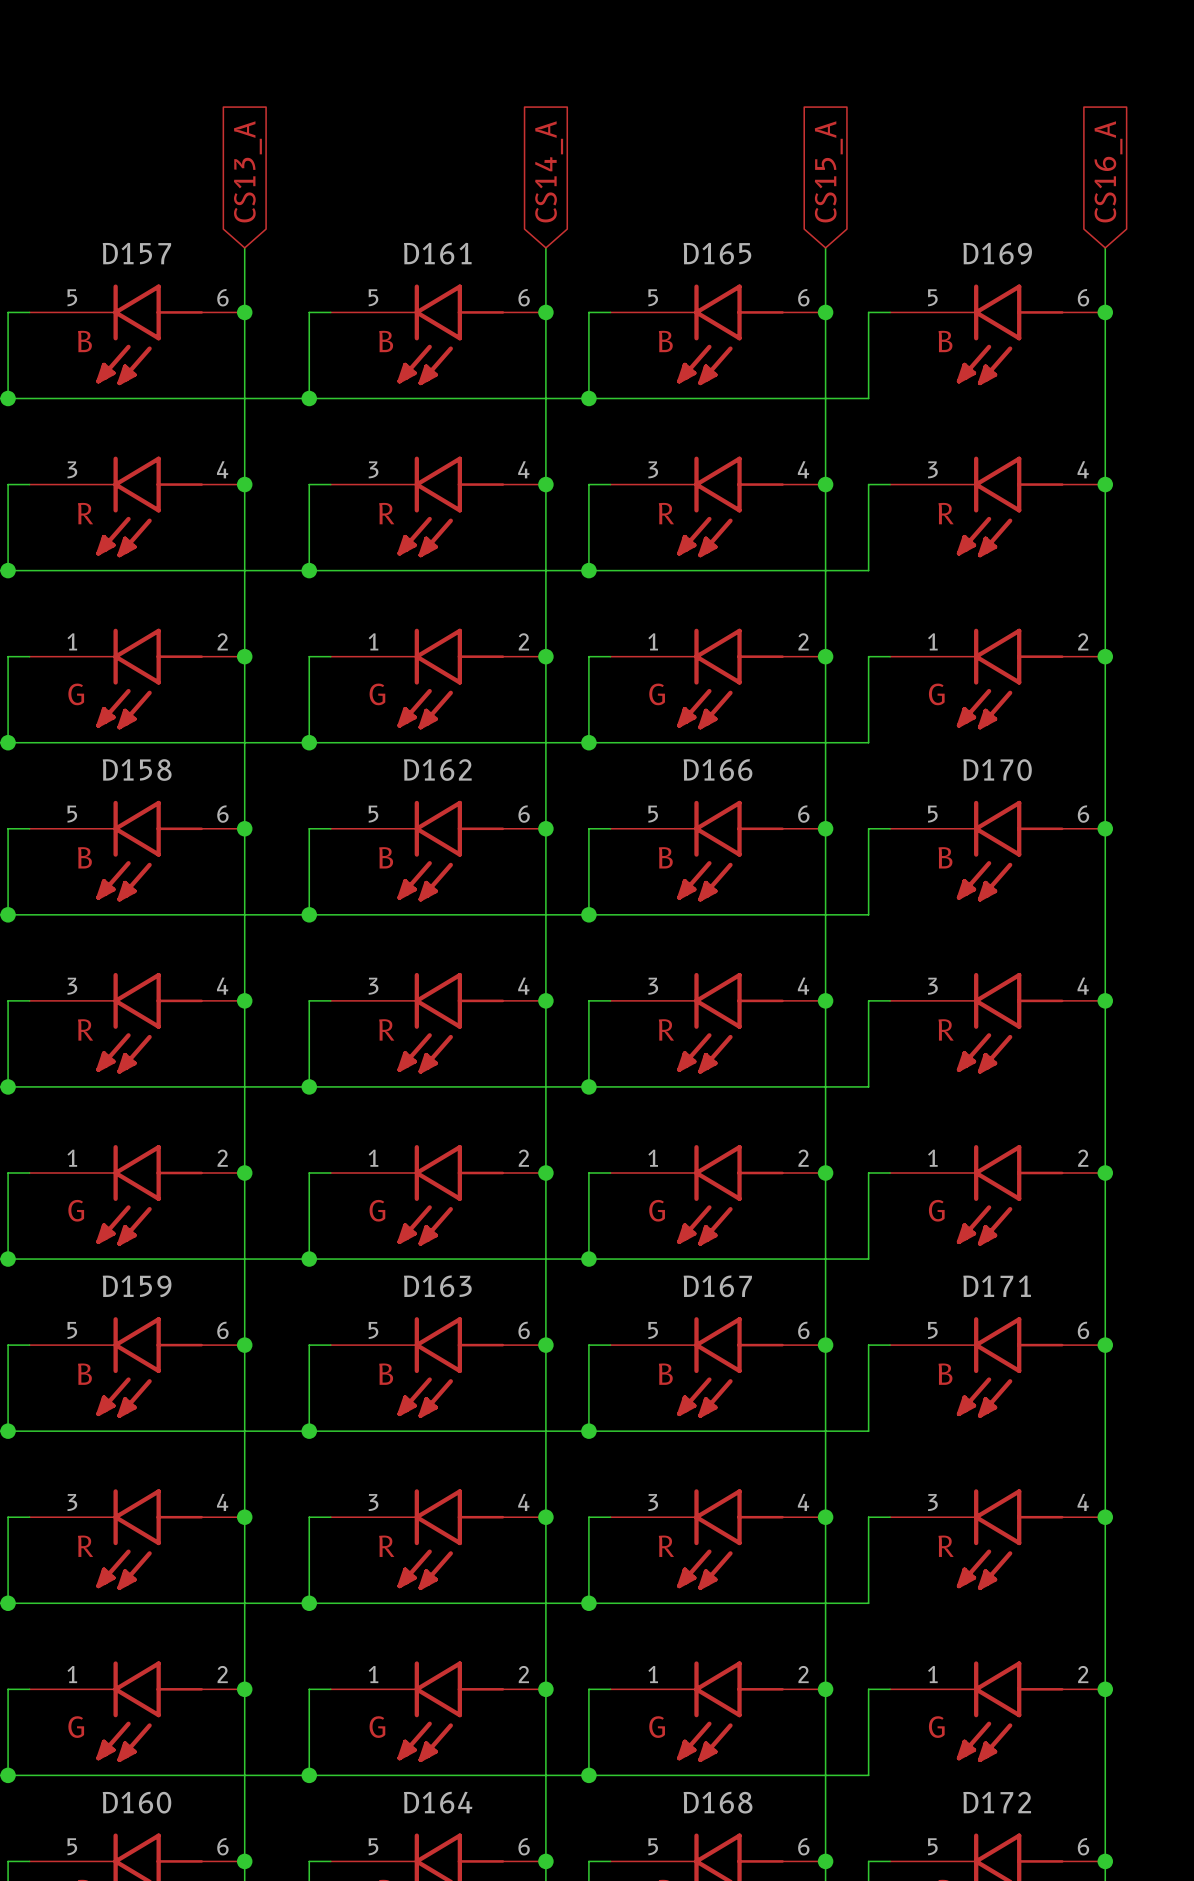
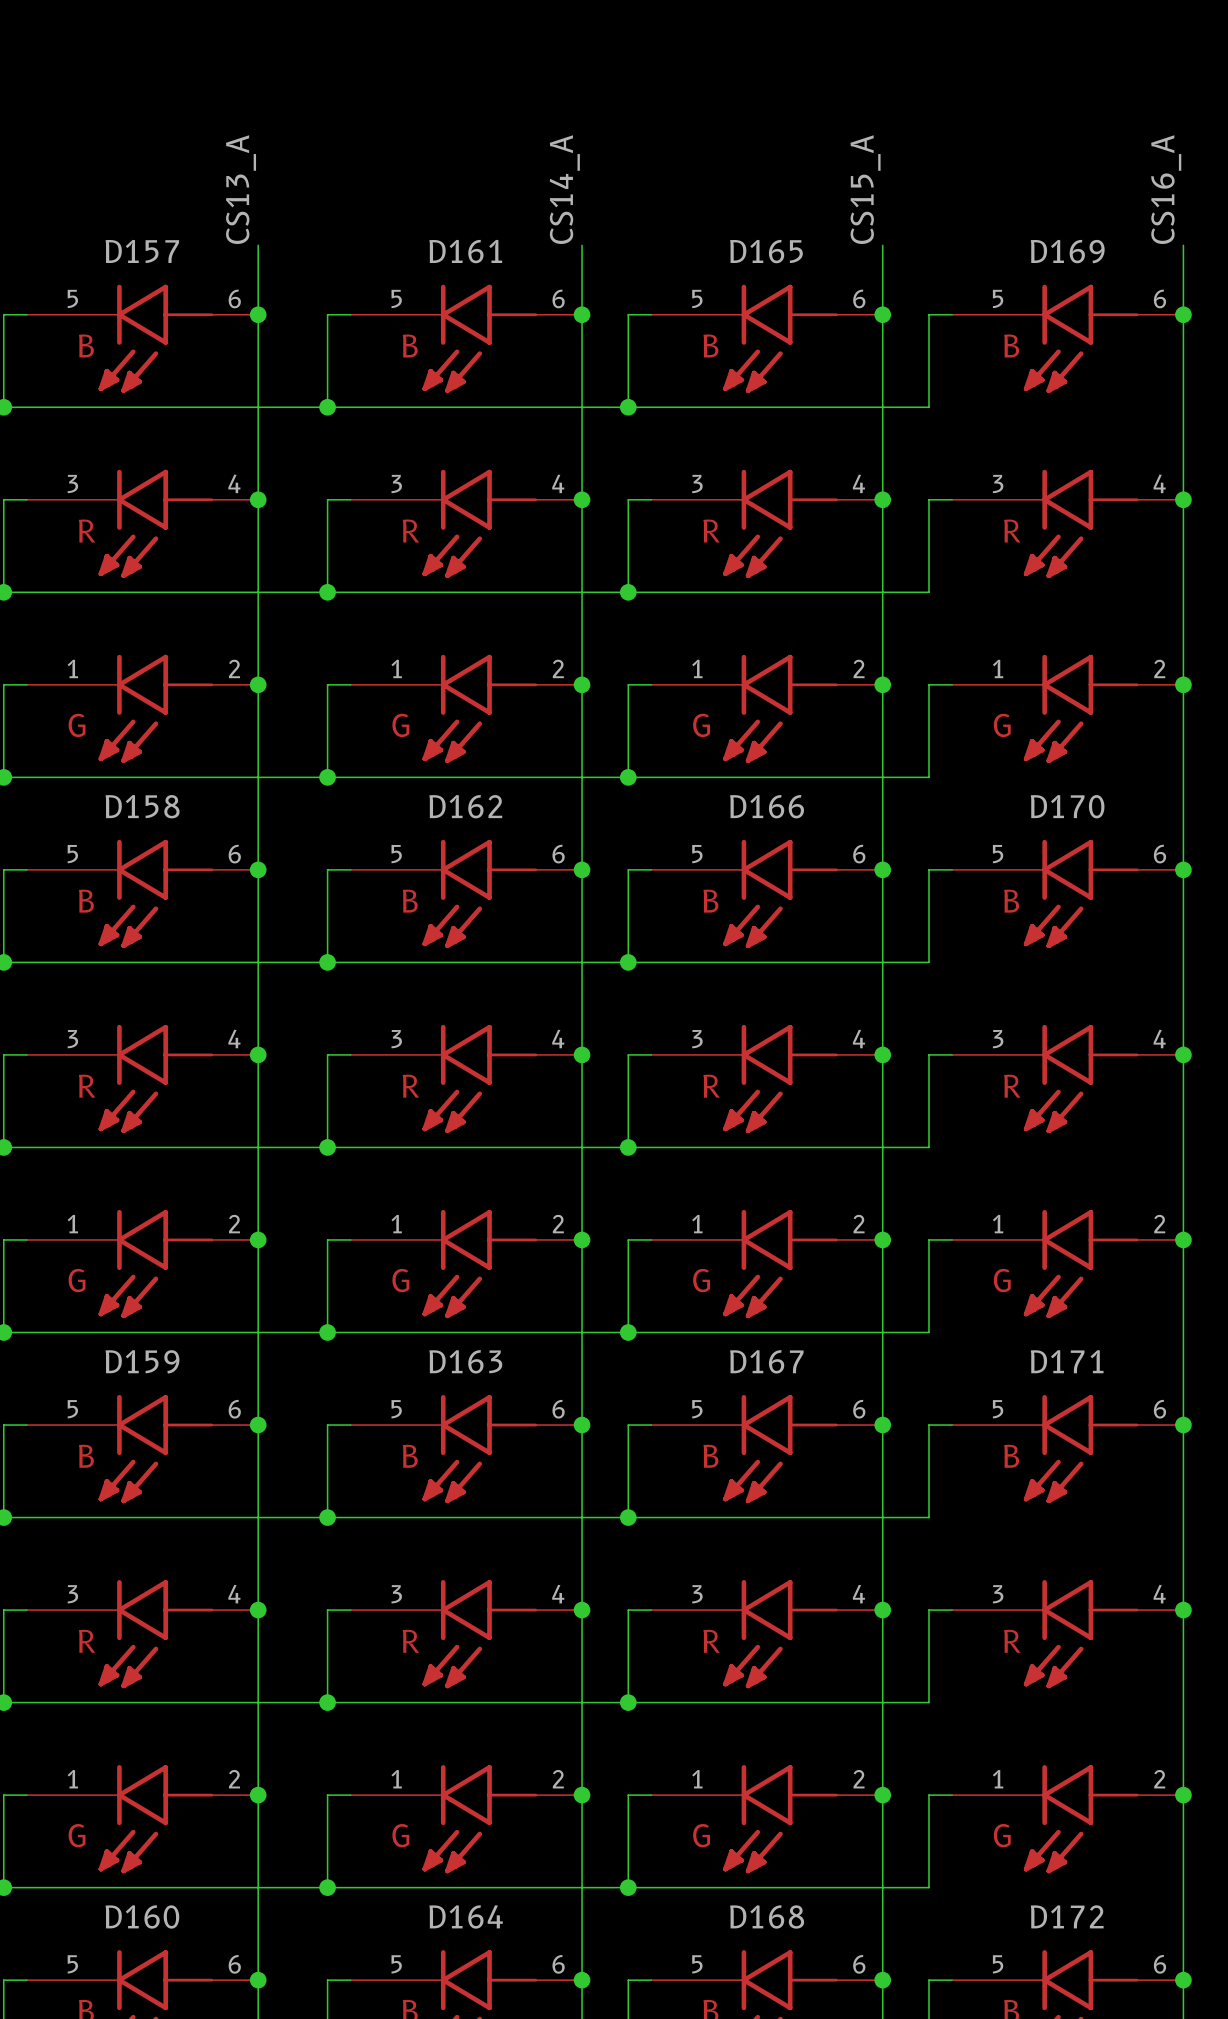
global label: CS13_A (247, 171) -> none
global label: CS14_A (549, 171) -> none
global label: CS15_A (828, 171) -> none
global label: CS16_A (1108, 171) -> none
label: none -> CS13_A (241, 189)
label: none -> CS14_A (564, 189)
label: none -> CS15_A (865, 189)
label: none -> CS16_A (1166, 189)

